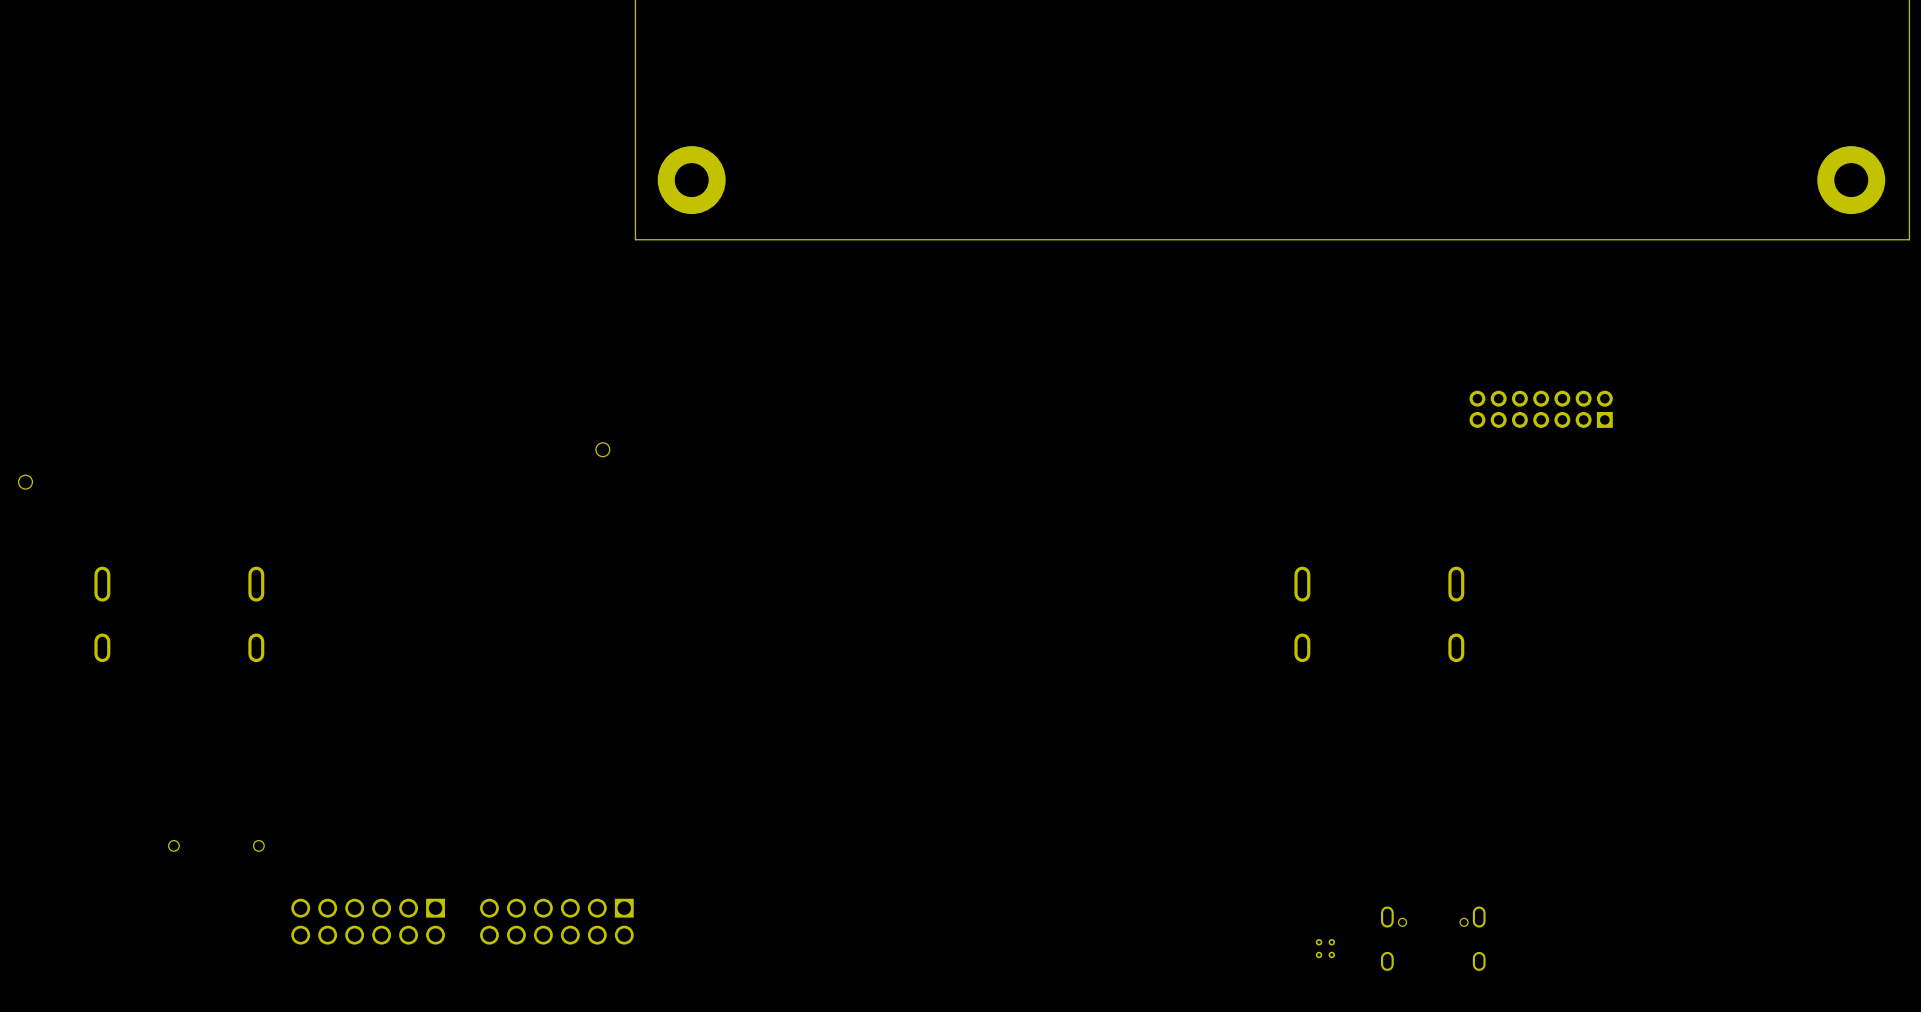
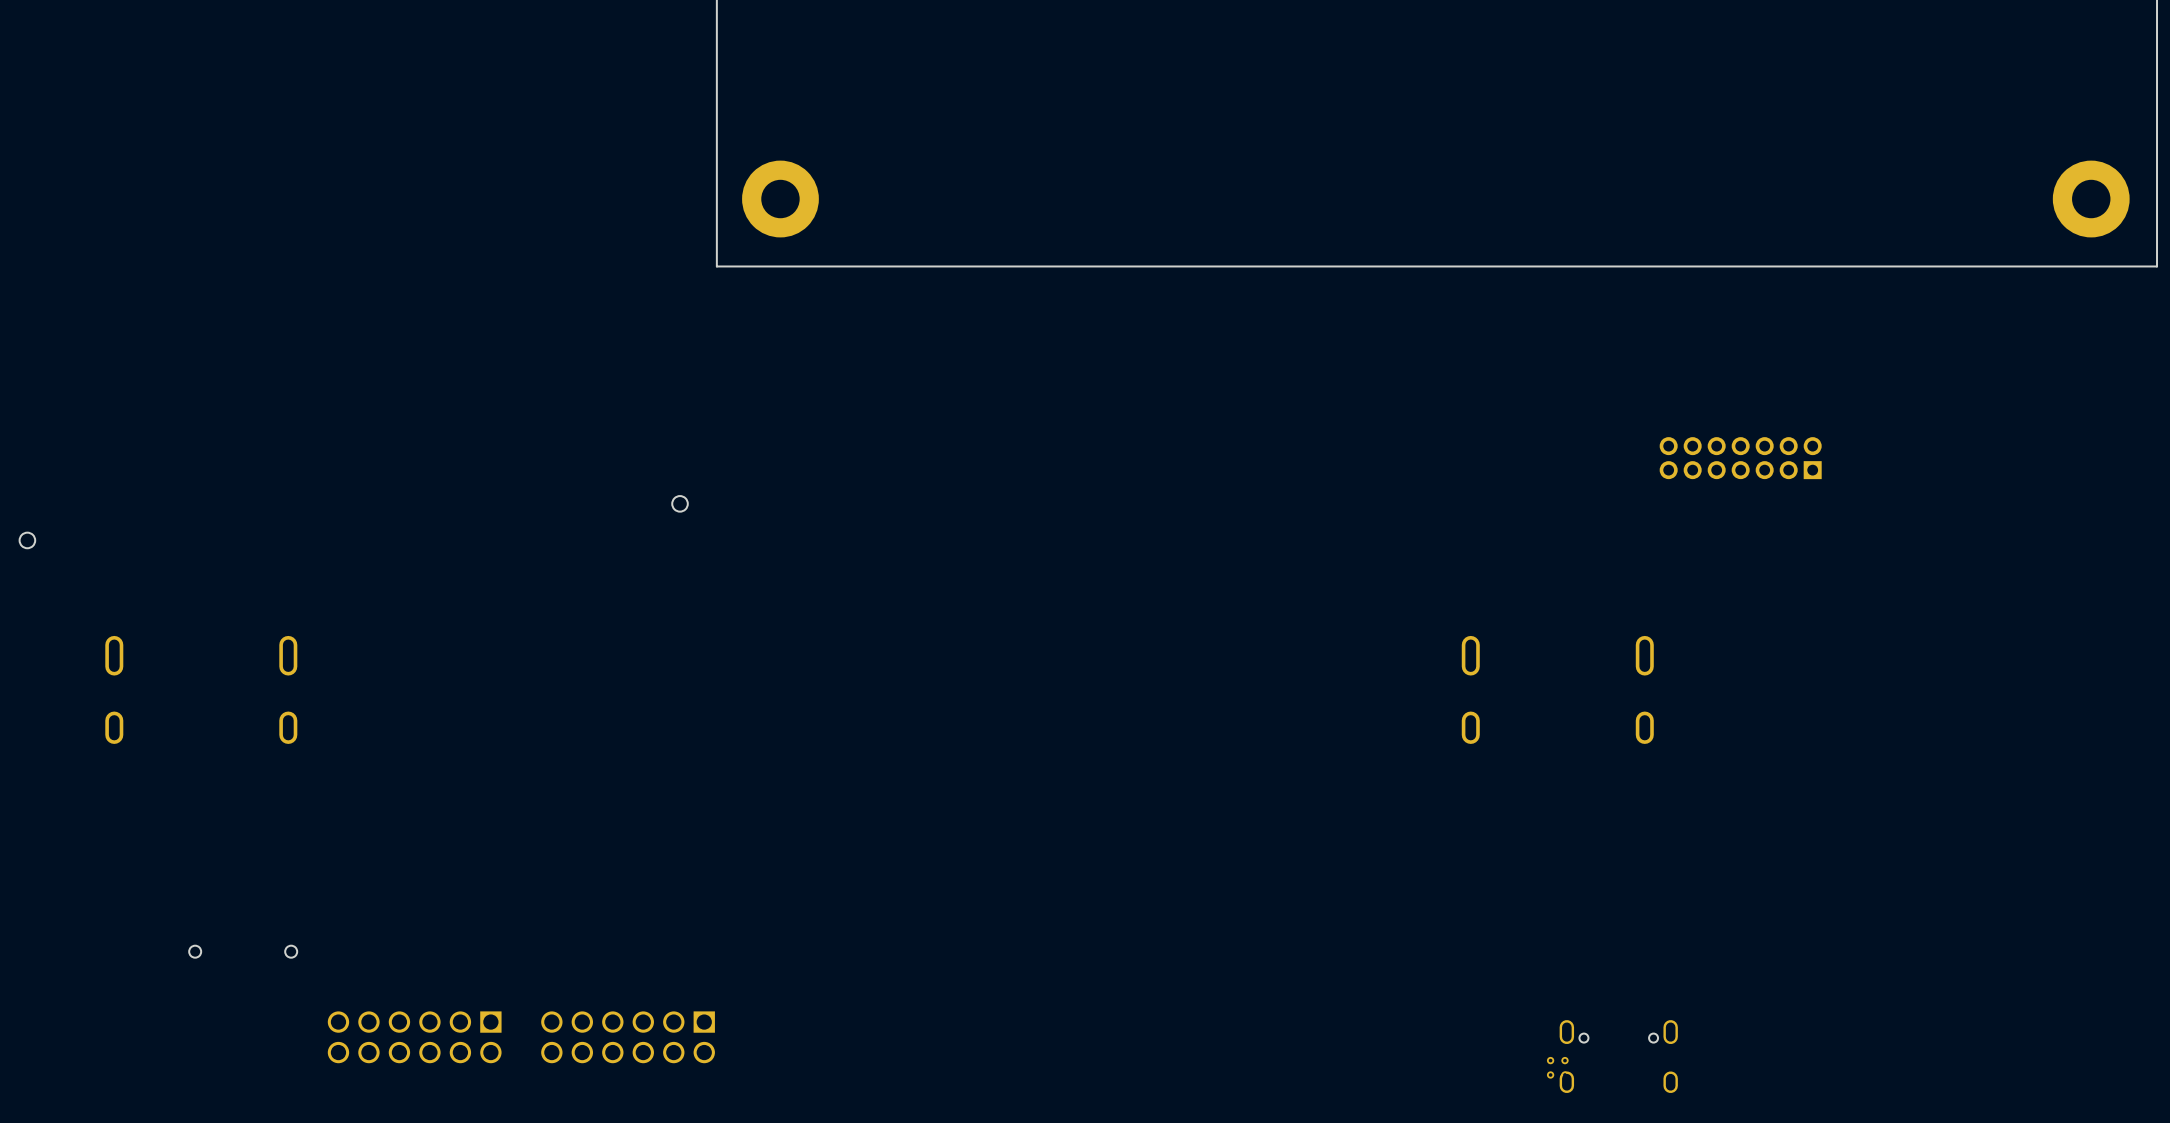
part position: (1325, 948) -> (1557, 1067)

